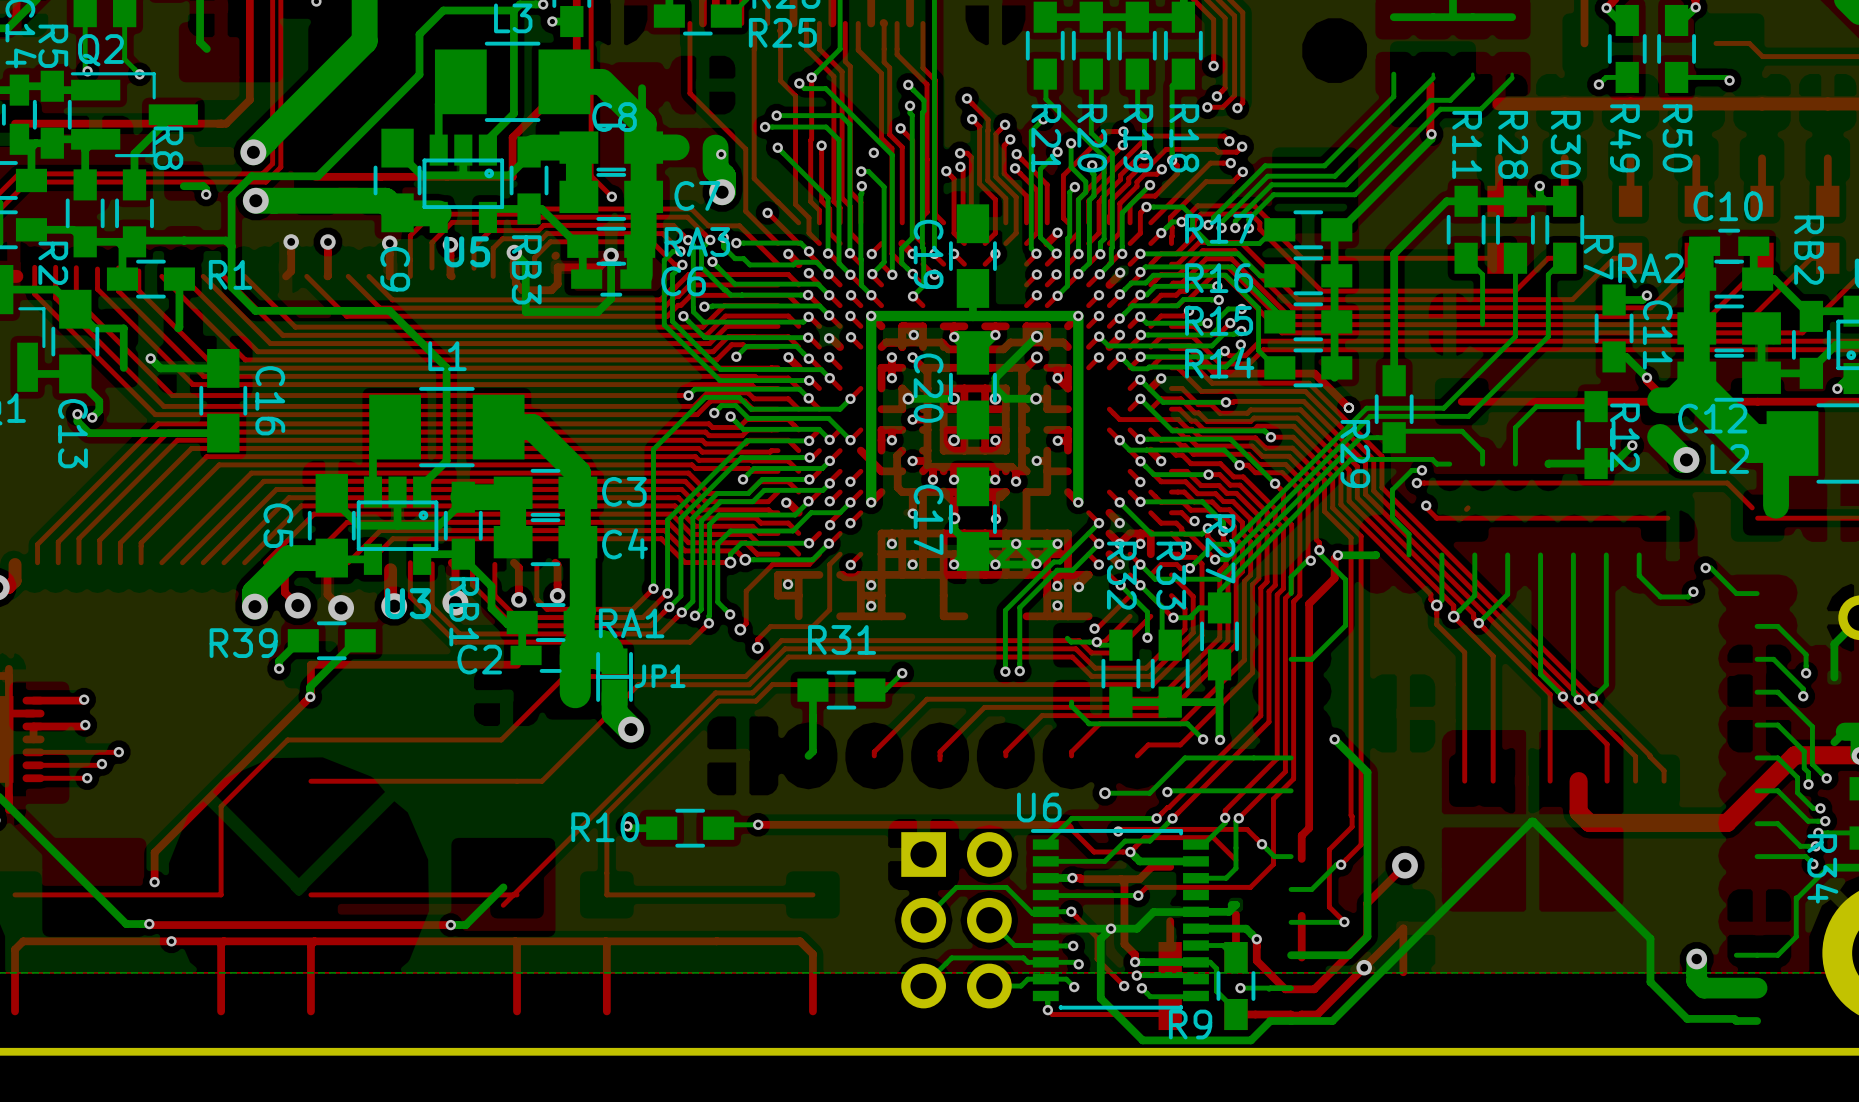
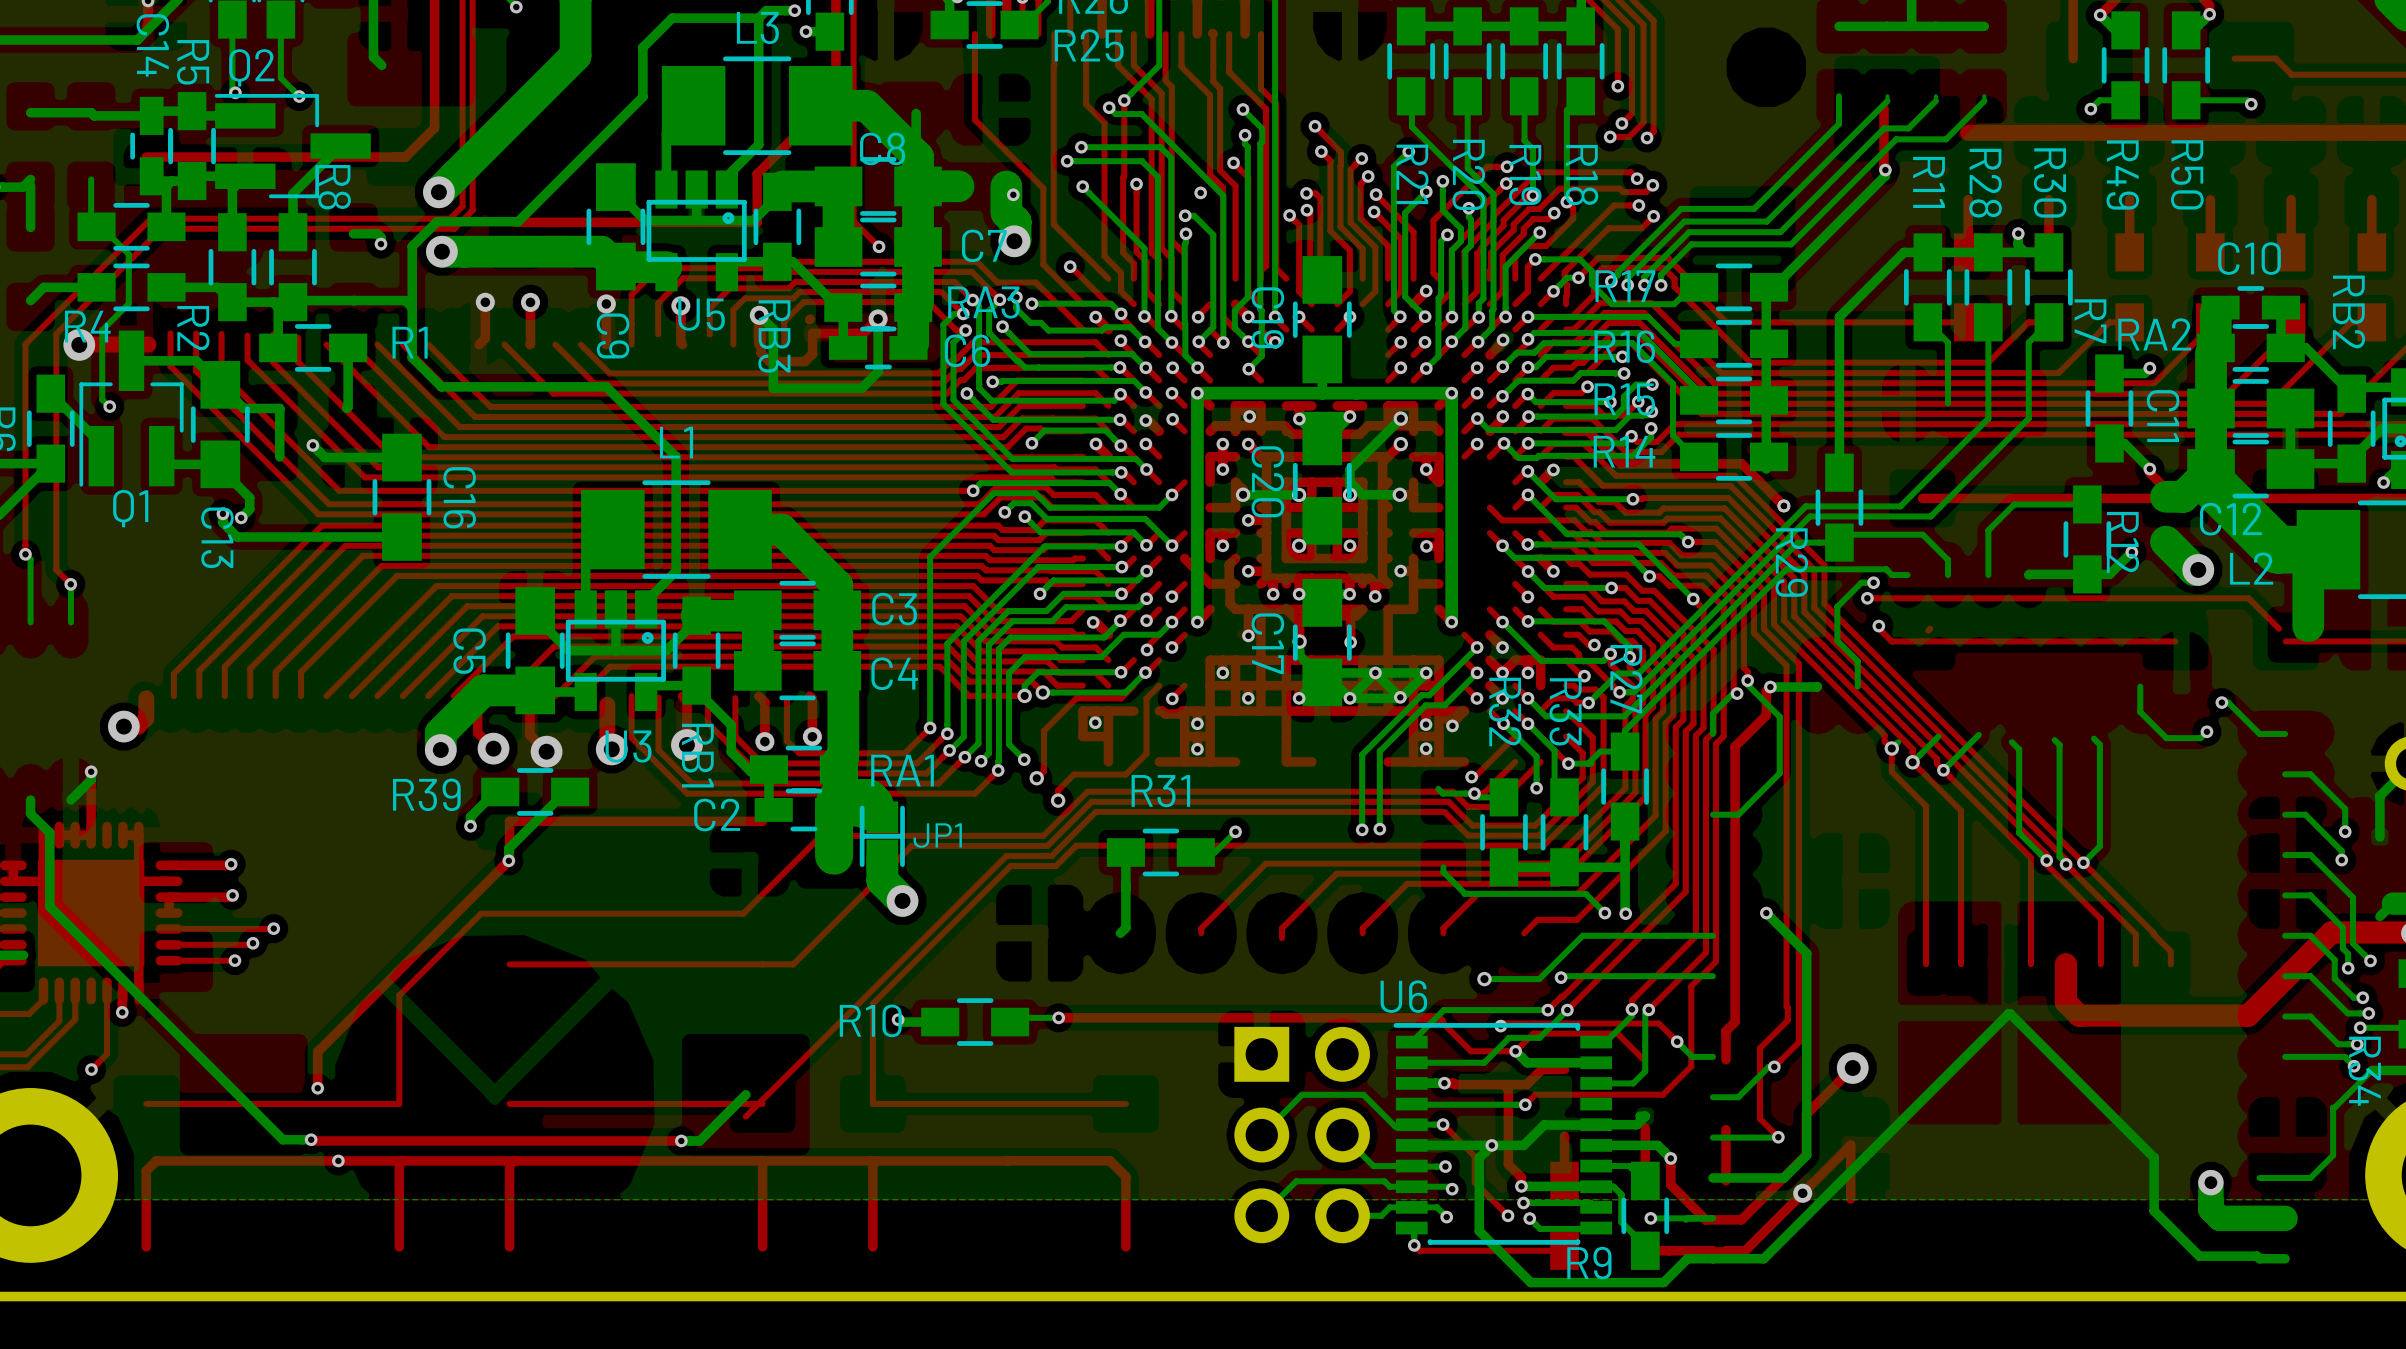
bottom track: (1441, 554) (1441, 600) -> none
bottom track: (1474, 554) (1474, 595) -> none
bottom track: (1507, 554) (1507, 594) -> none
bottom track: (1540, 554) (1540, 606) -> (2011, 742) (2019, 749)
bottom track: (1573, 554) (1573, 602) -> (2054, 740) (2059, 744)
bottom track: (1606, 554) (1606, 602) -> (2093, 738) (2099, 744)

